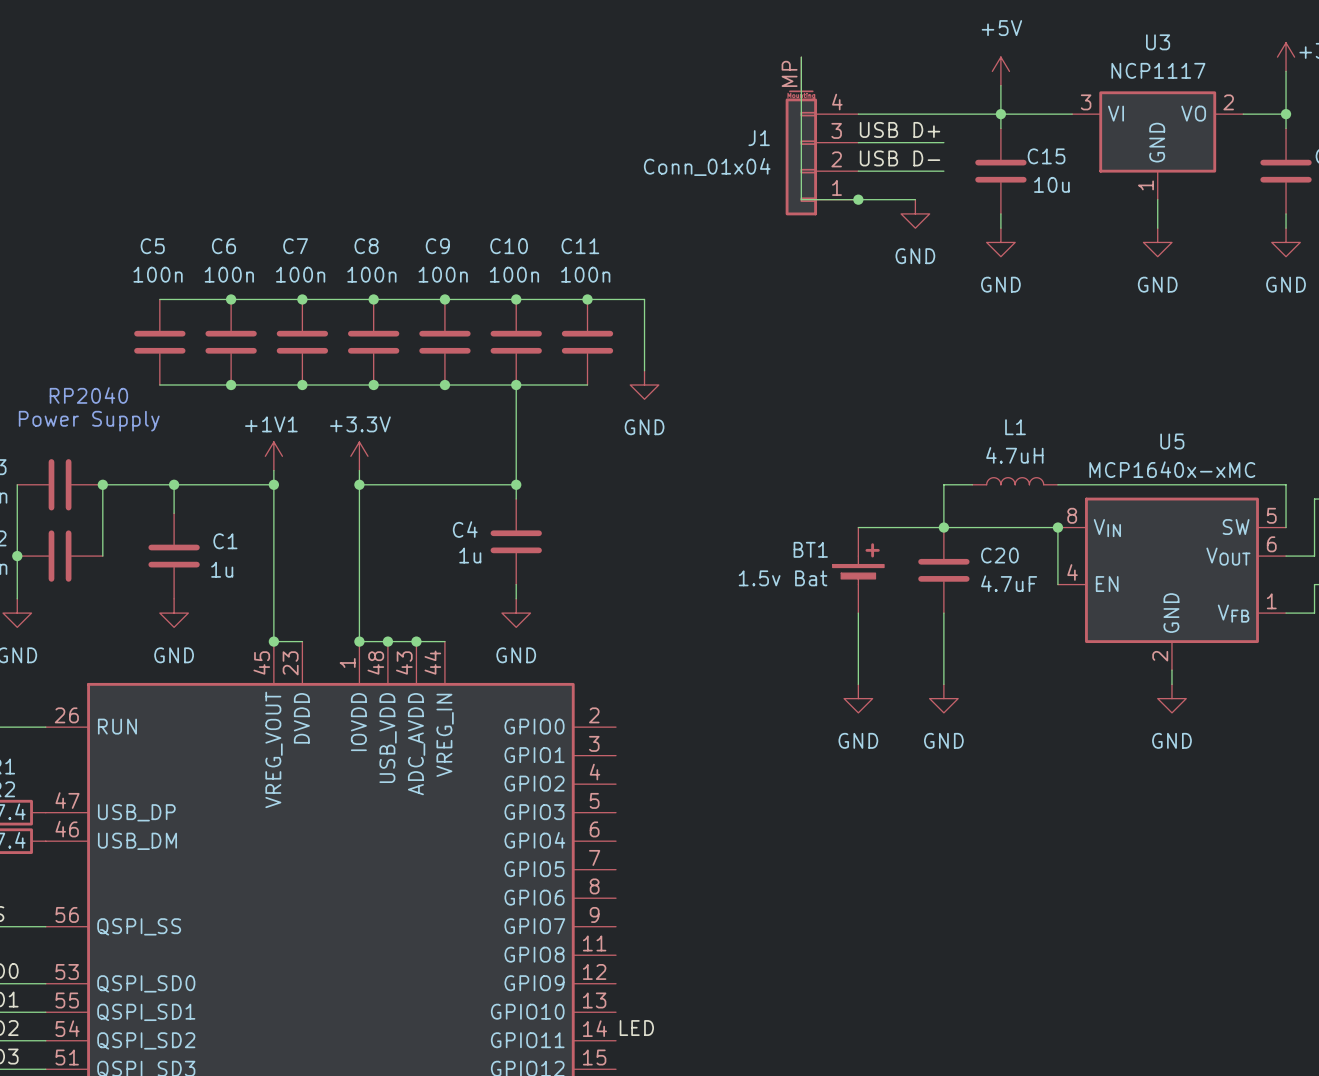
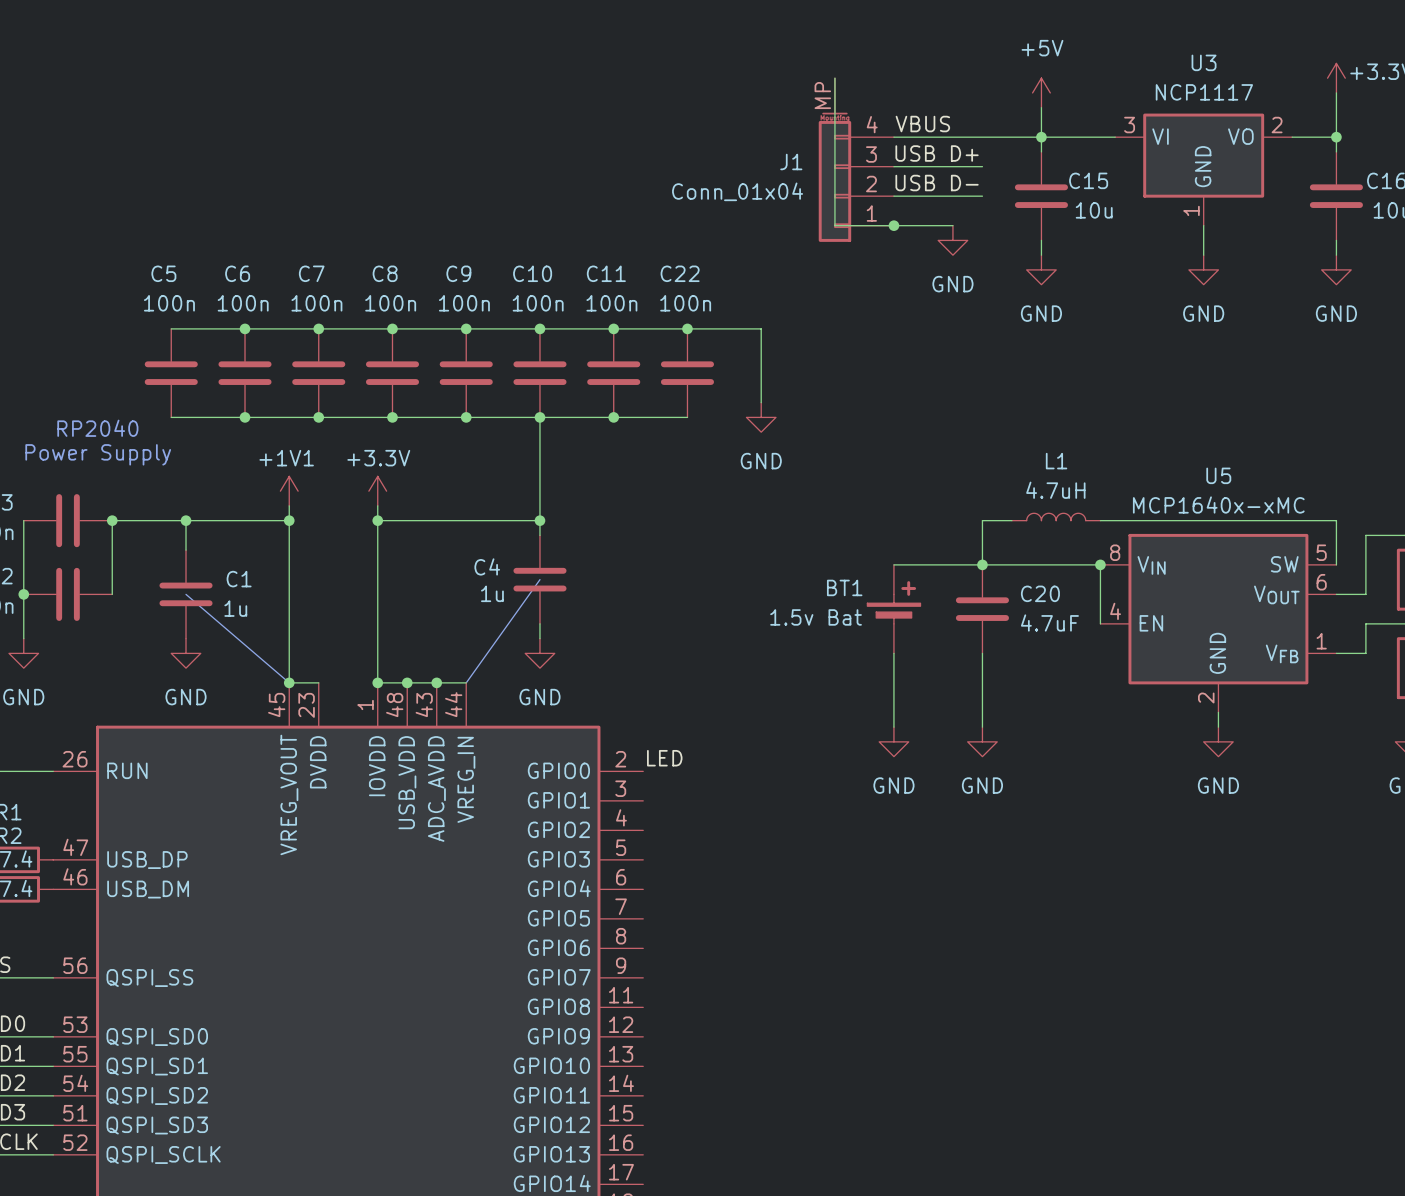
label: none -> VBUS (922, 124)
wire: (644, 299) (644, 370) -> (672, 328) (761, 328) (761, 402)
junction: none -> (687, 328)
C22: none -> 100n (687, 373)
wire: none -> (613, 417) (687, 417)
junction: none -> (613, 417)
power symbol position: GND (644, 385) -> GND (761, 417)
line: none -> (539, 579) (466, 682)
line: none -> (186, 594) (289, 682)
label: none -> LED (664, 758)
label: LED (636, 1028) -> none

